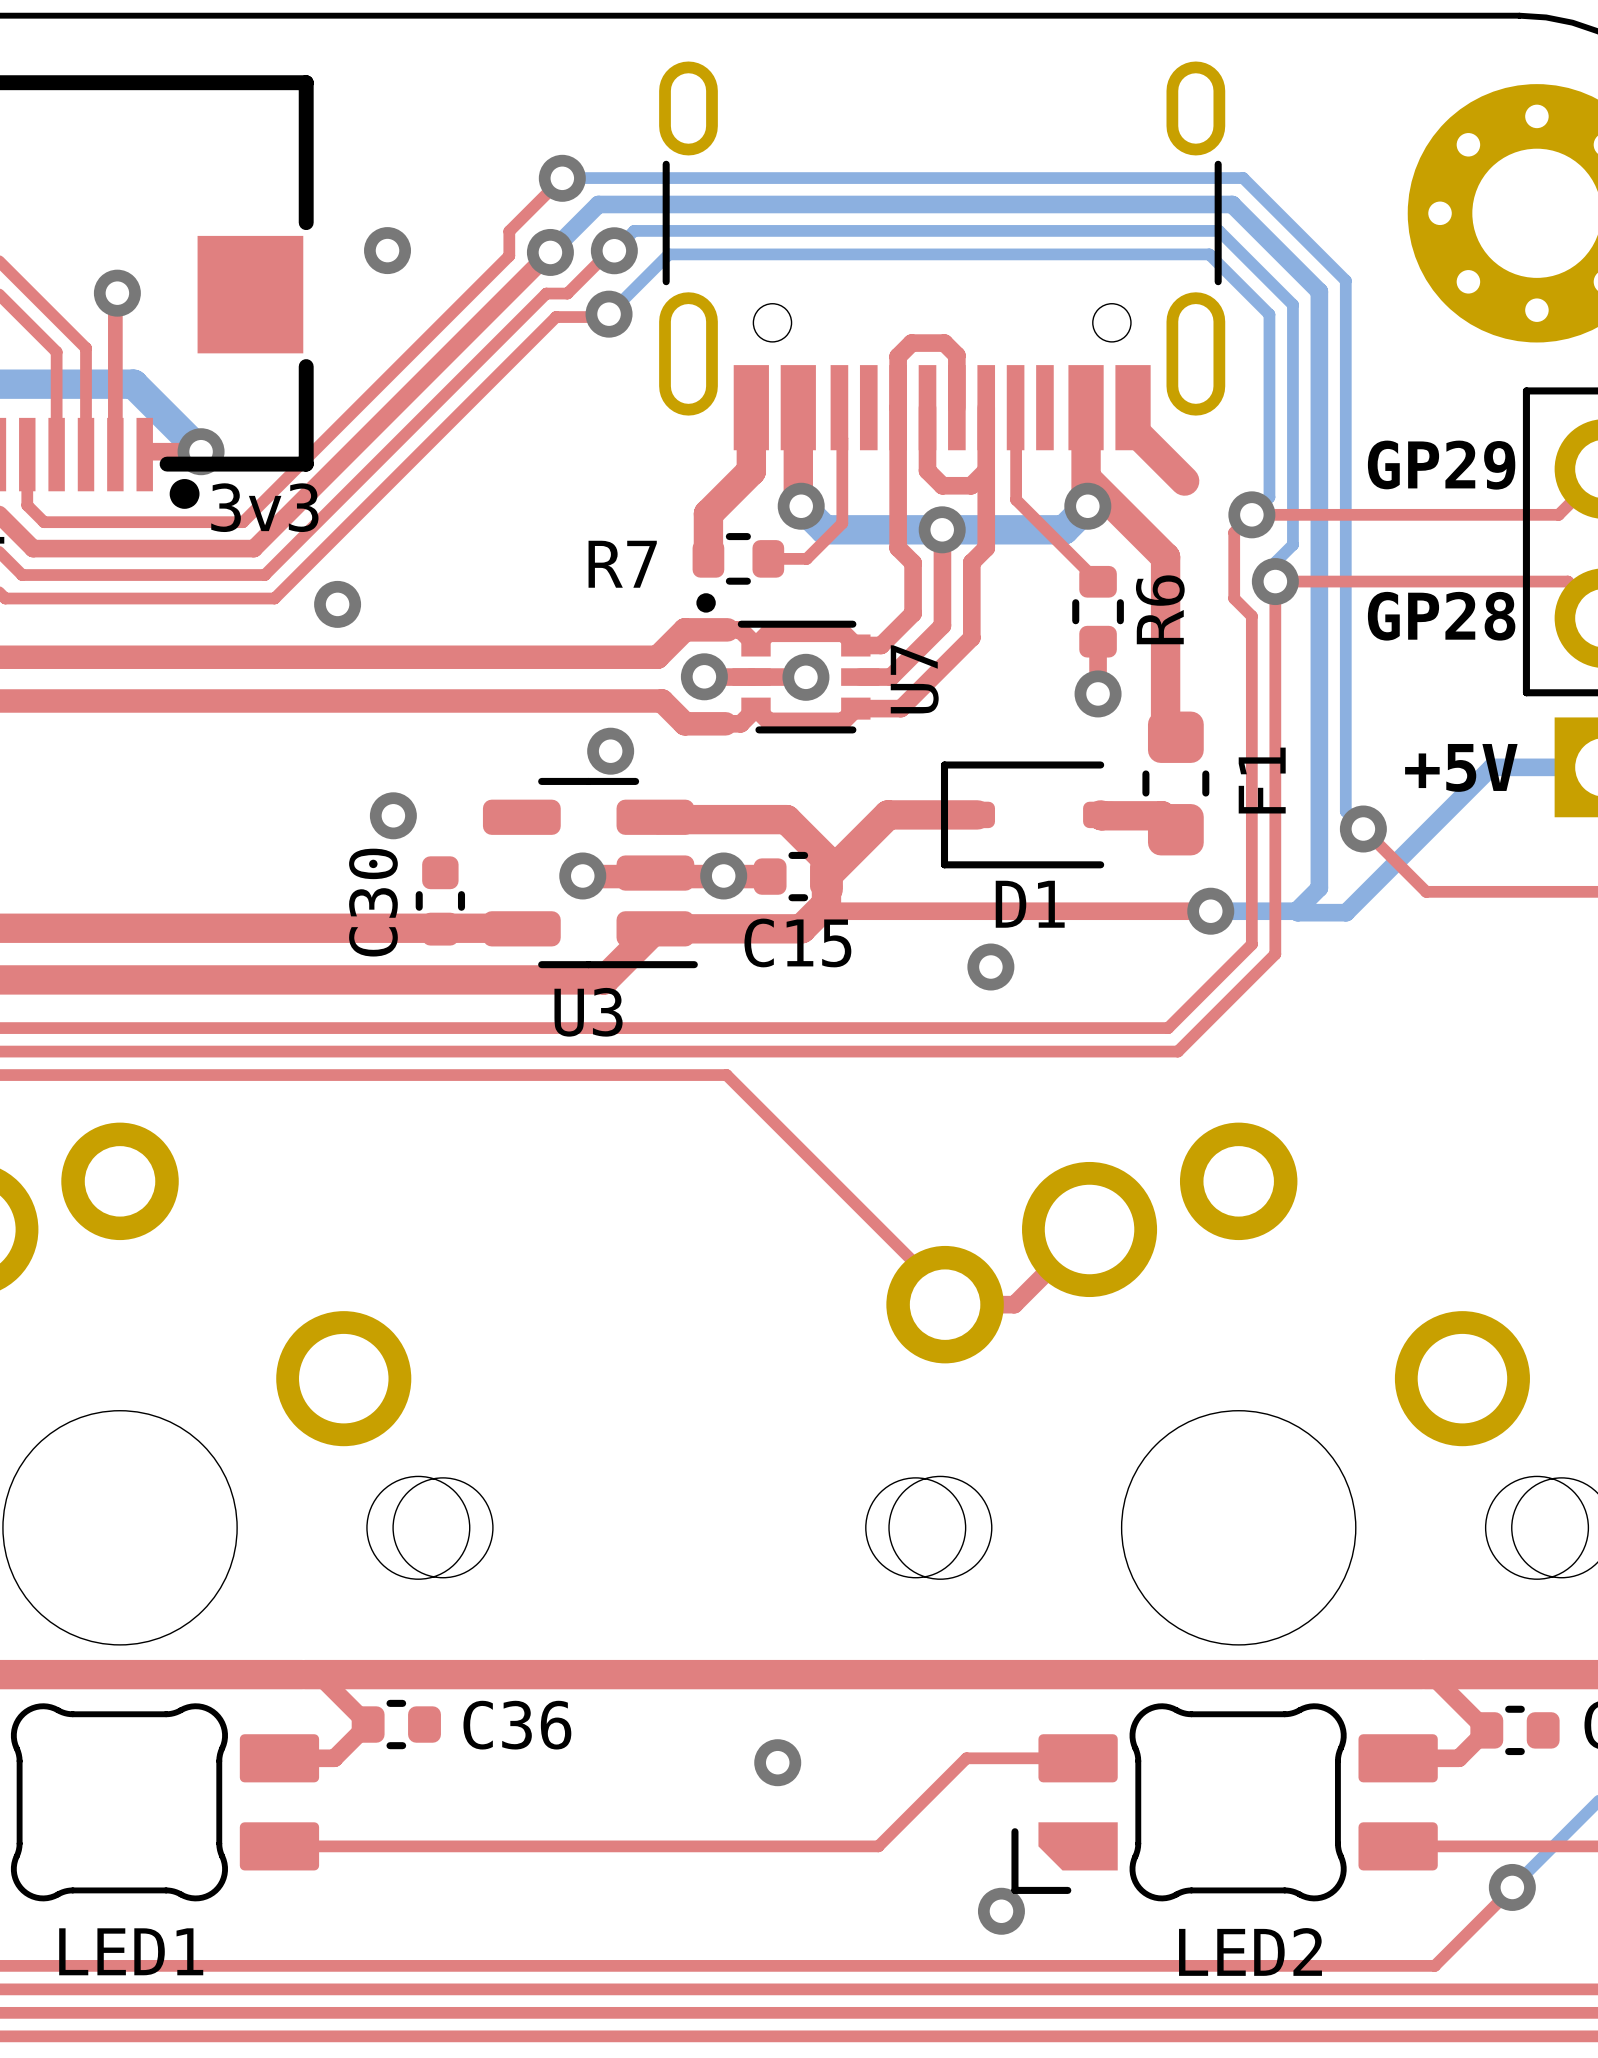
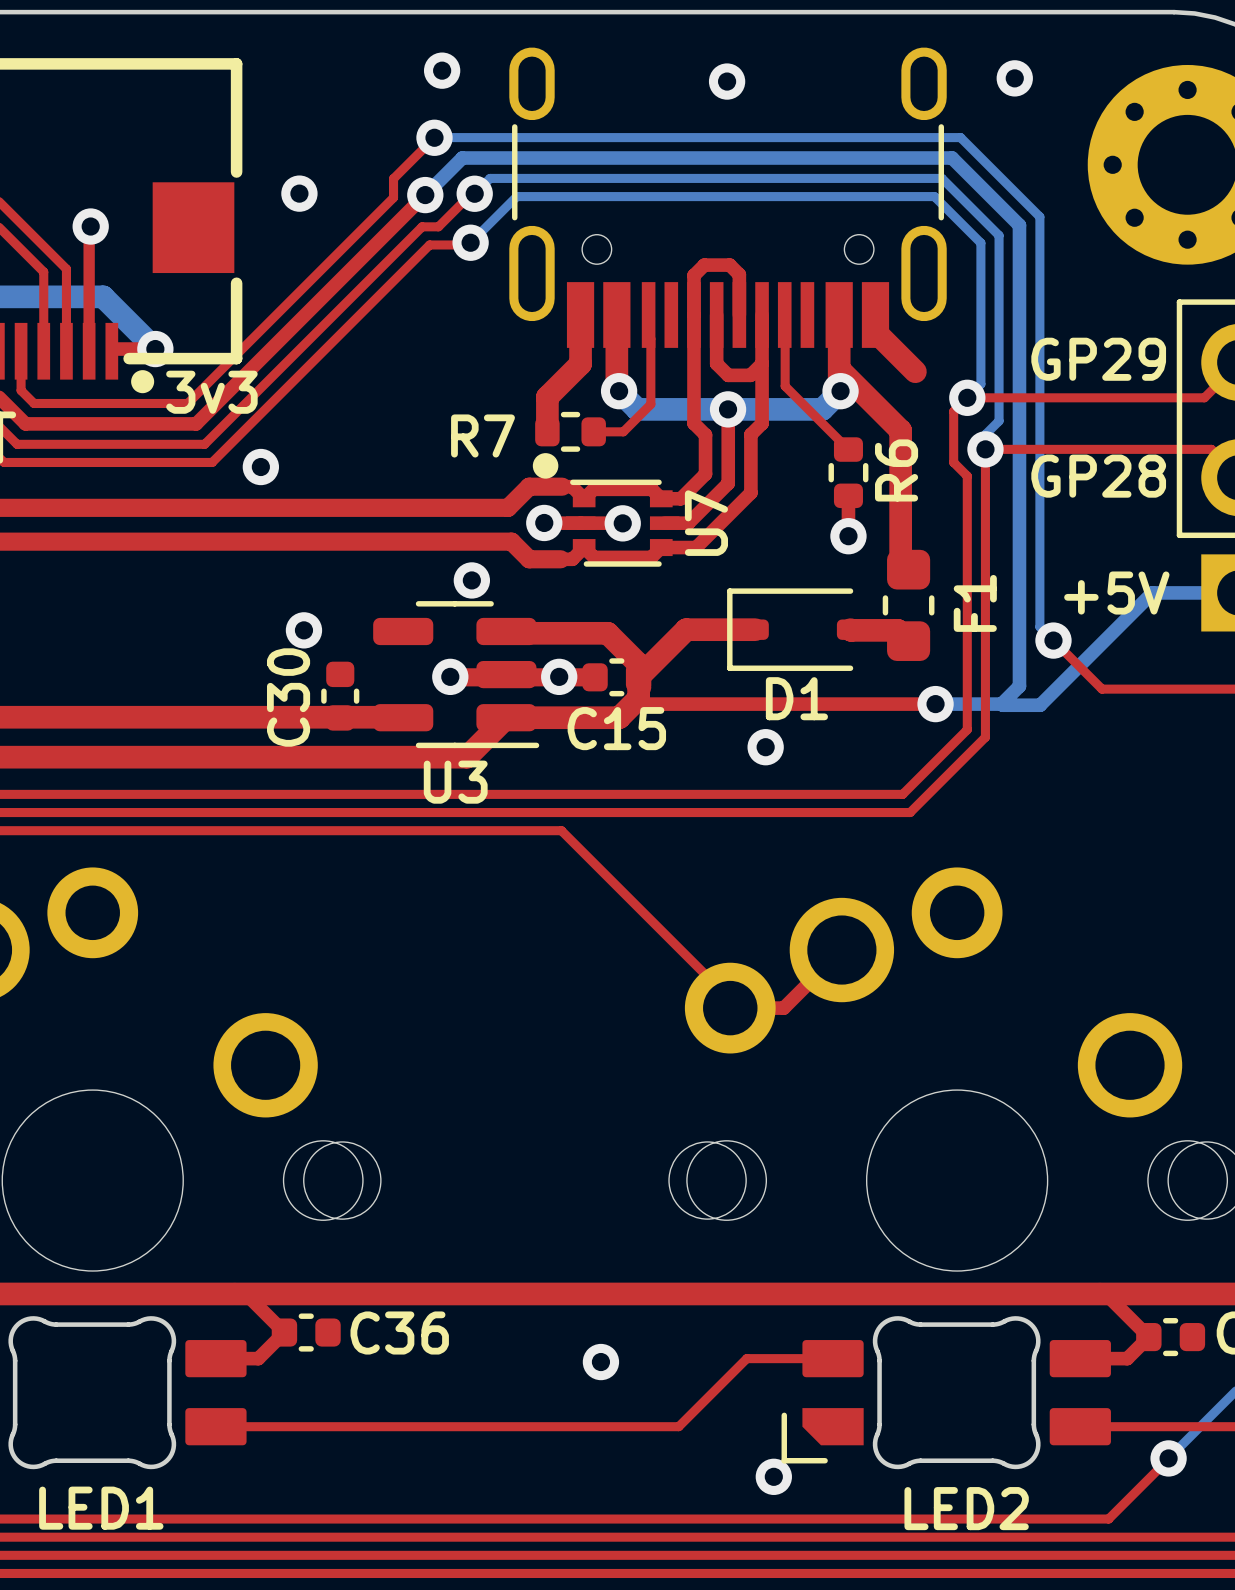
via: none -> (442, 70)
via: none -> (1014, 78)
via: none -> (727, 81)
drawing shape: [696, 593, 716, 613] -> [532, 453, 559, 479]

